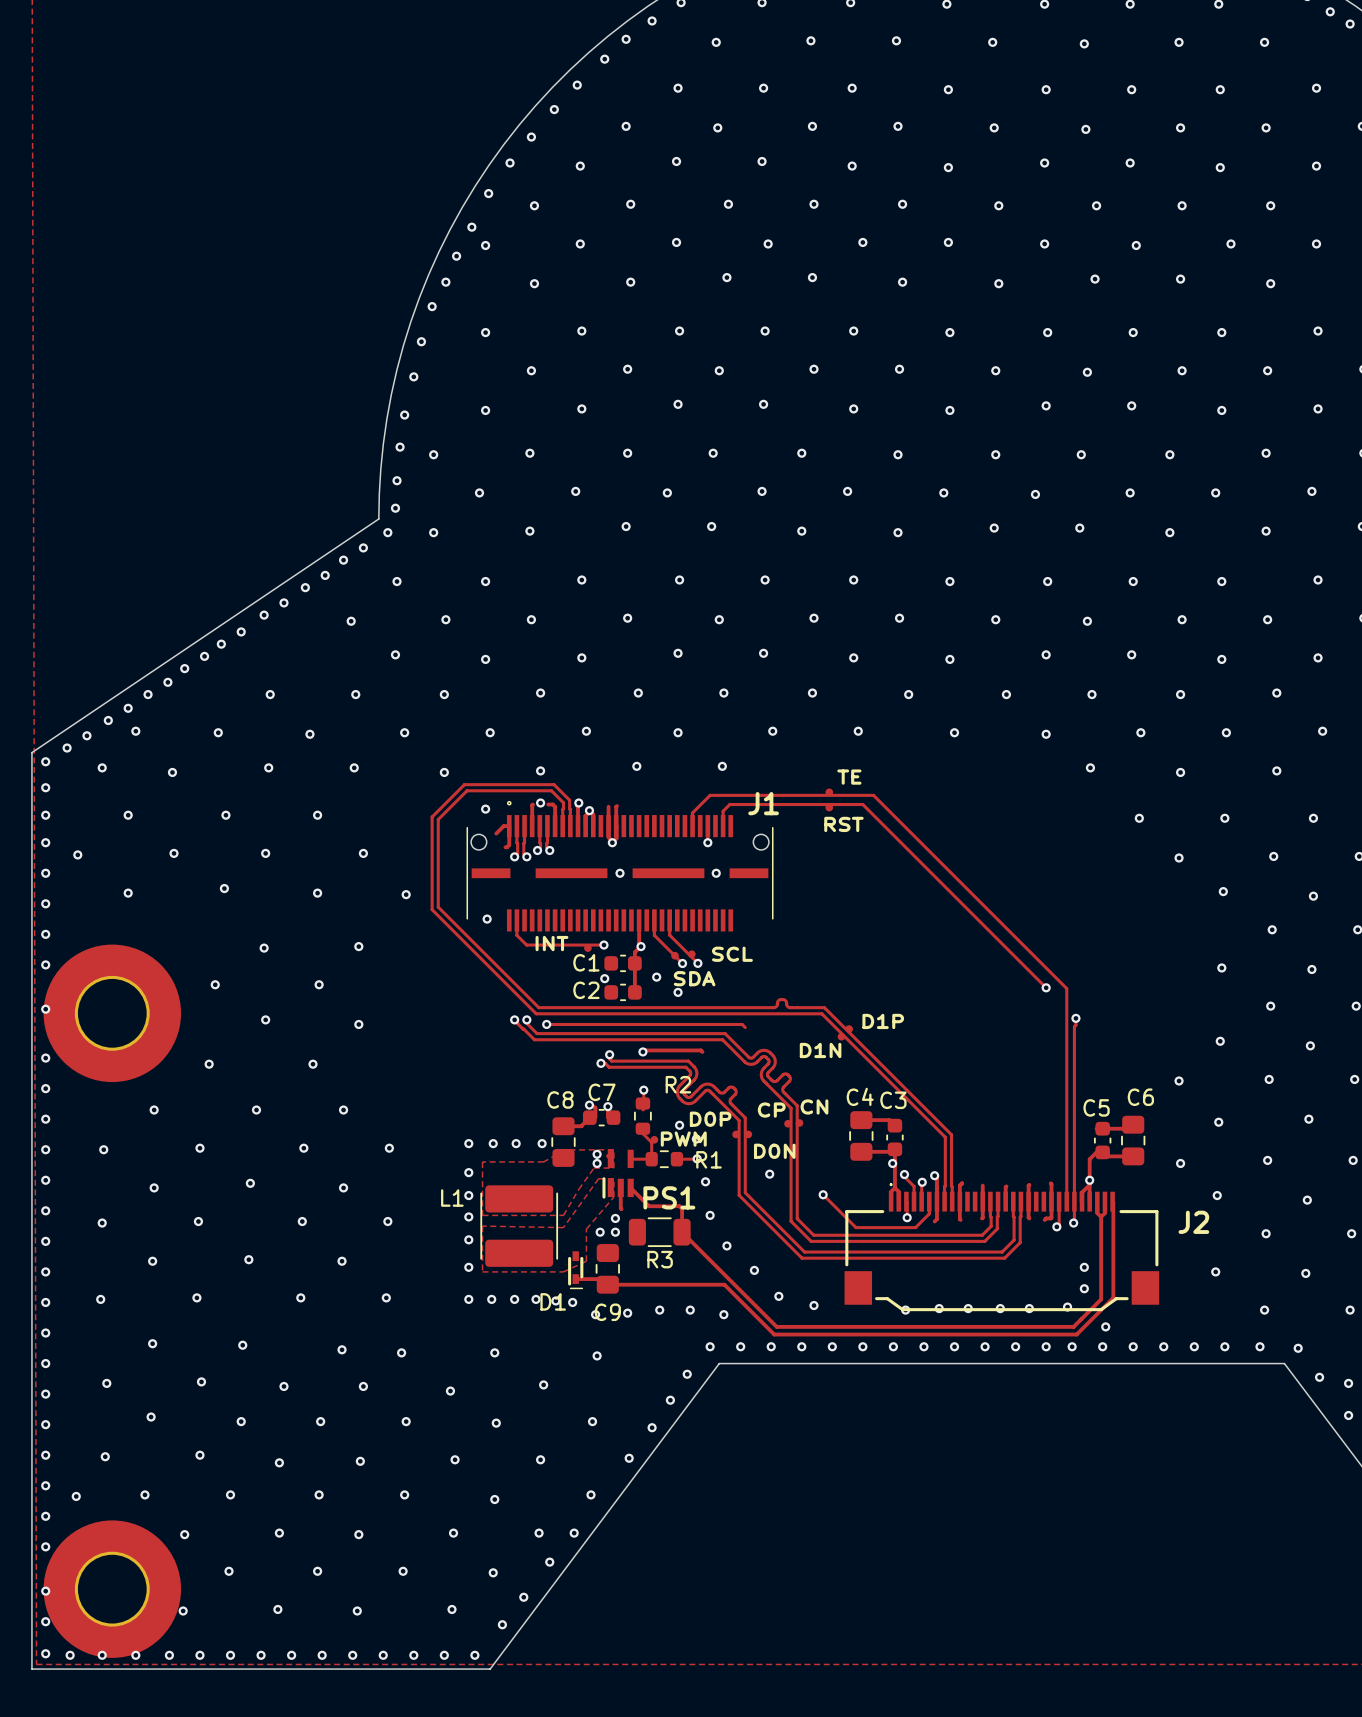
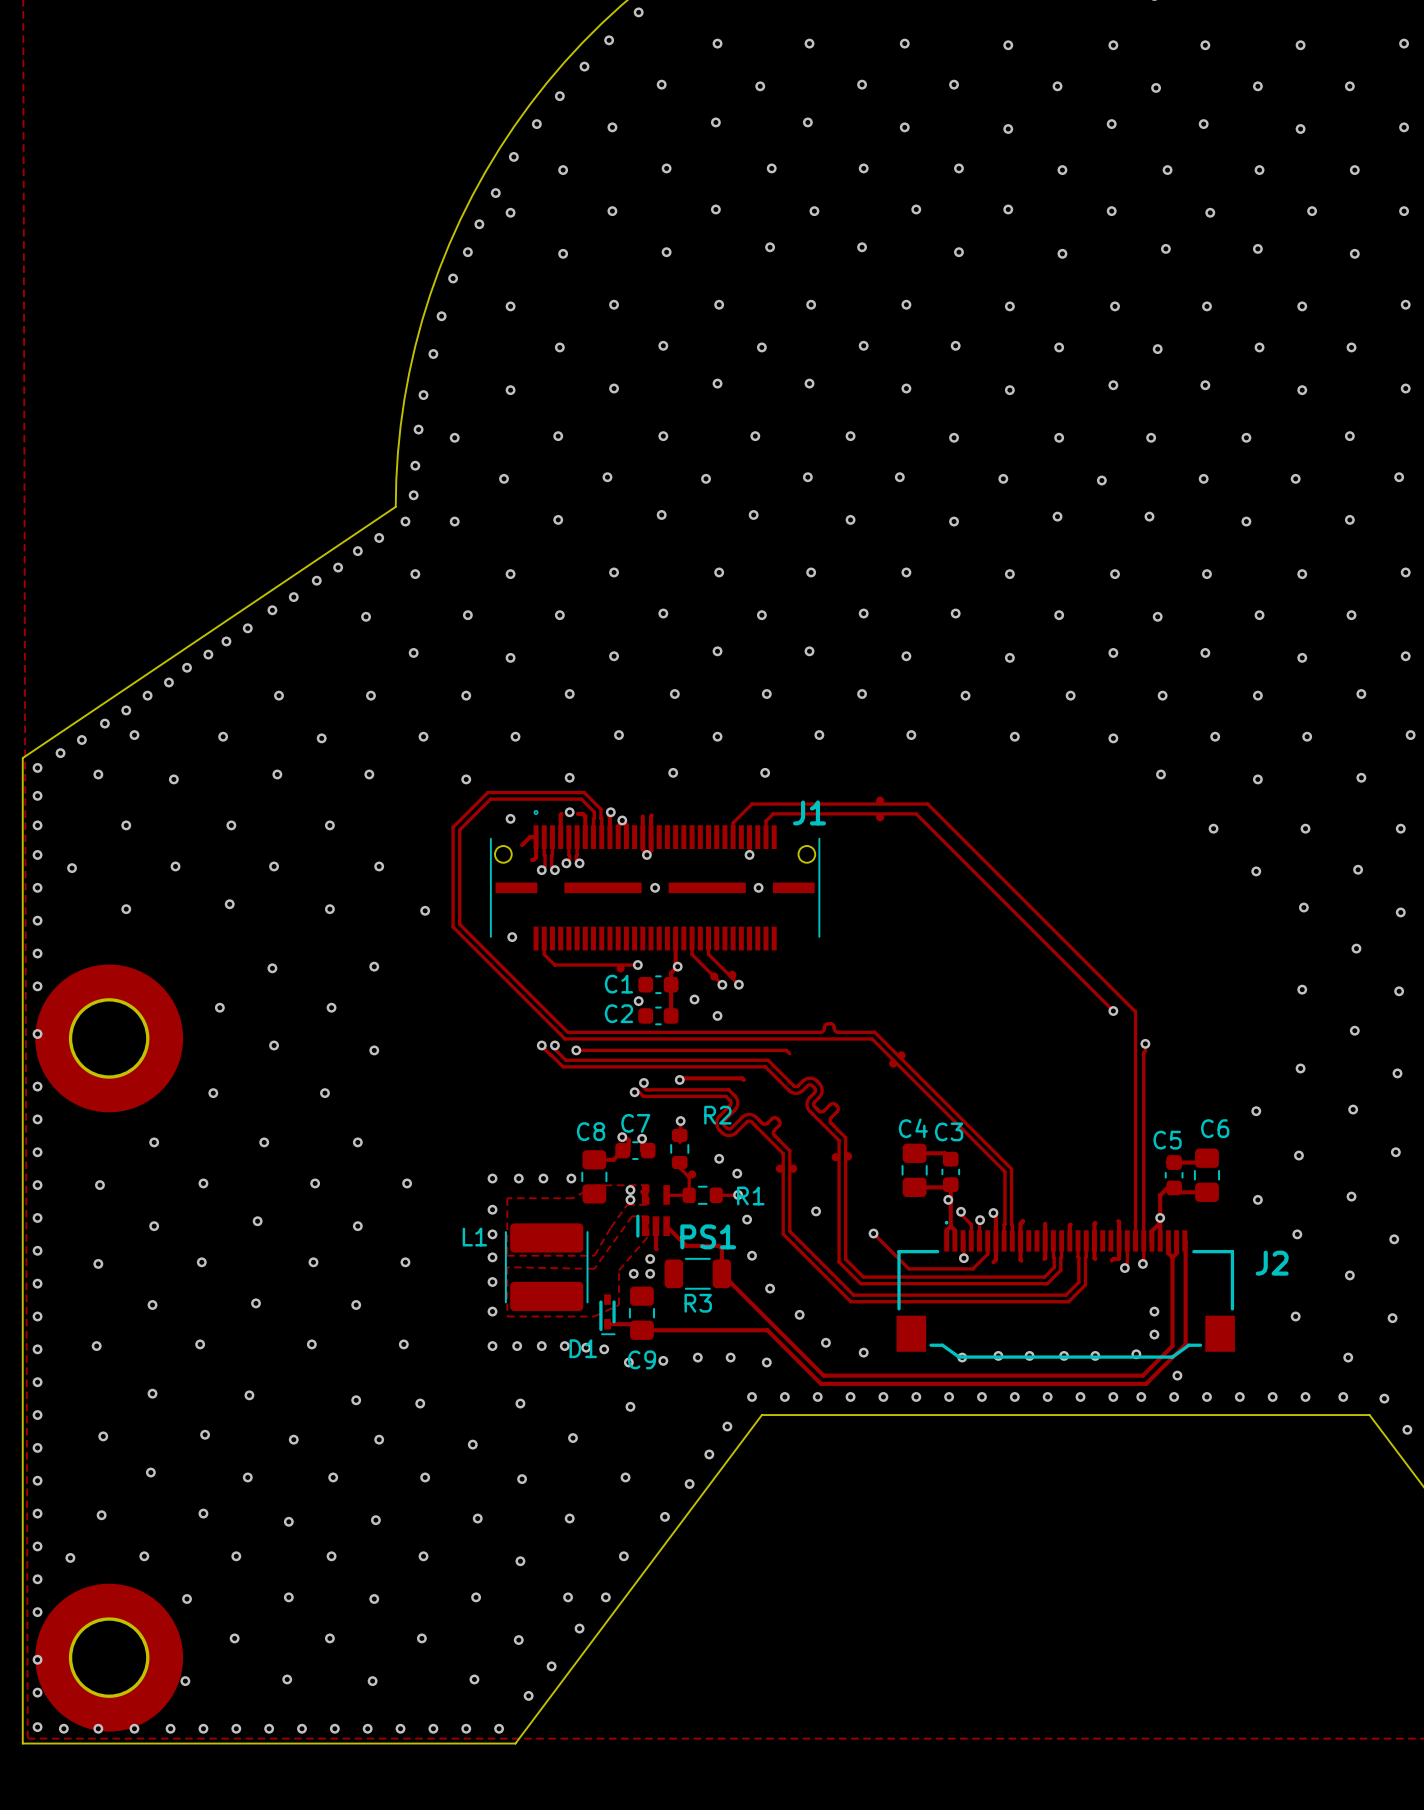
text: TE (849, 777) -> none
text: RST (843, 824) -> none
text: INT (551, 943) -> none
text: SCL (732, 954) -> none
text: SDA (694, 978) -> none
text: D1P (883, 1021) -> none
text: D1N (820, 1050) -> none
text: CN (814, 1106) -> none
text: CP (771, 1110) -> none
text: D0P (710, 1119) -> none
text: PWM (683, 1139) -> none
text: D0N (774, 1151) -> none

